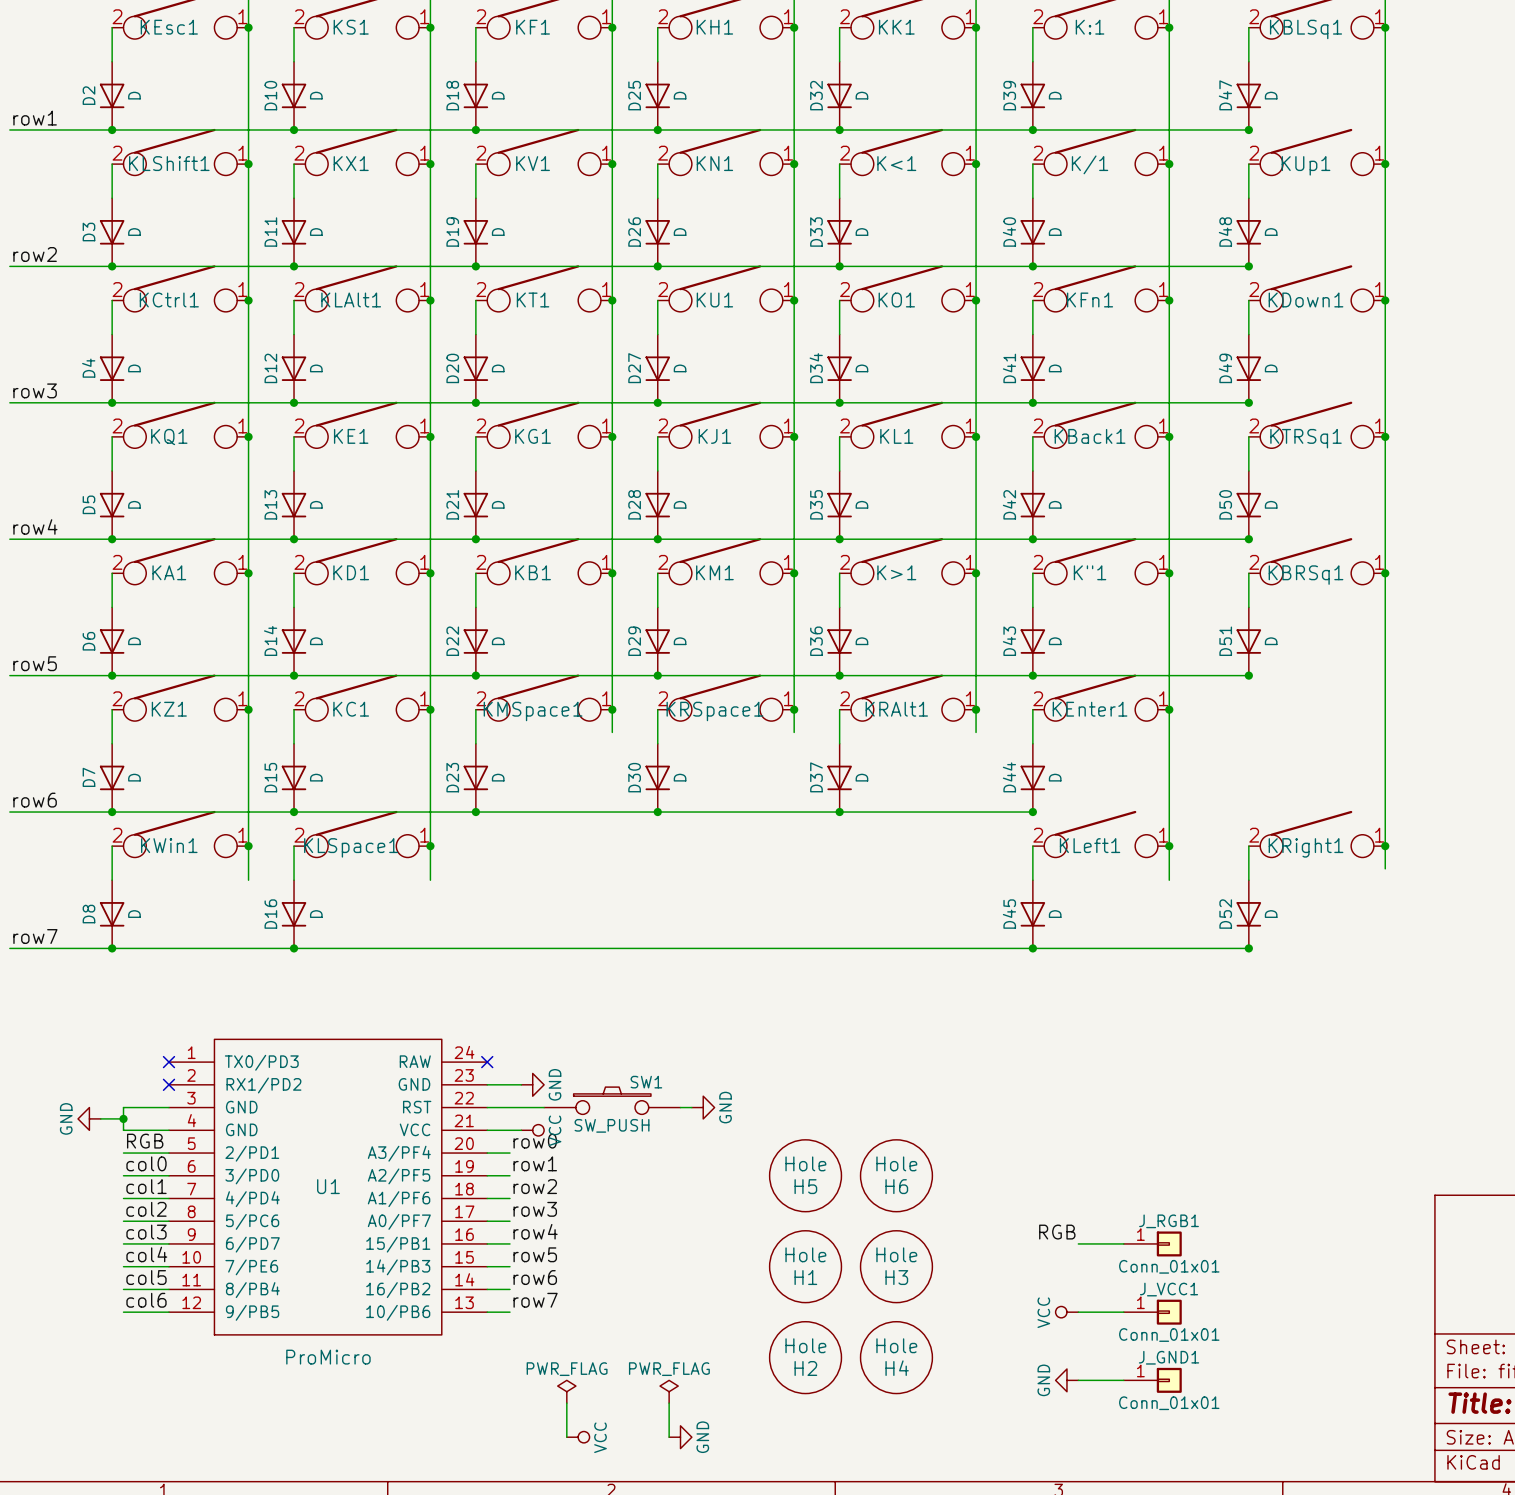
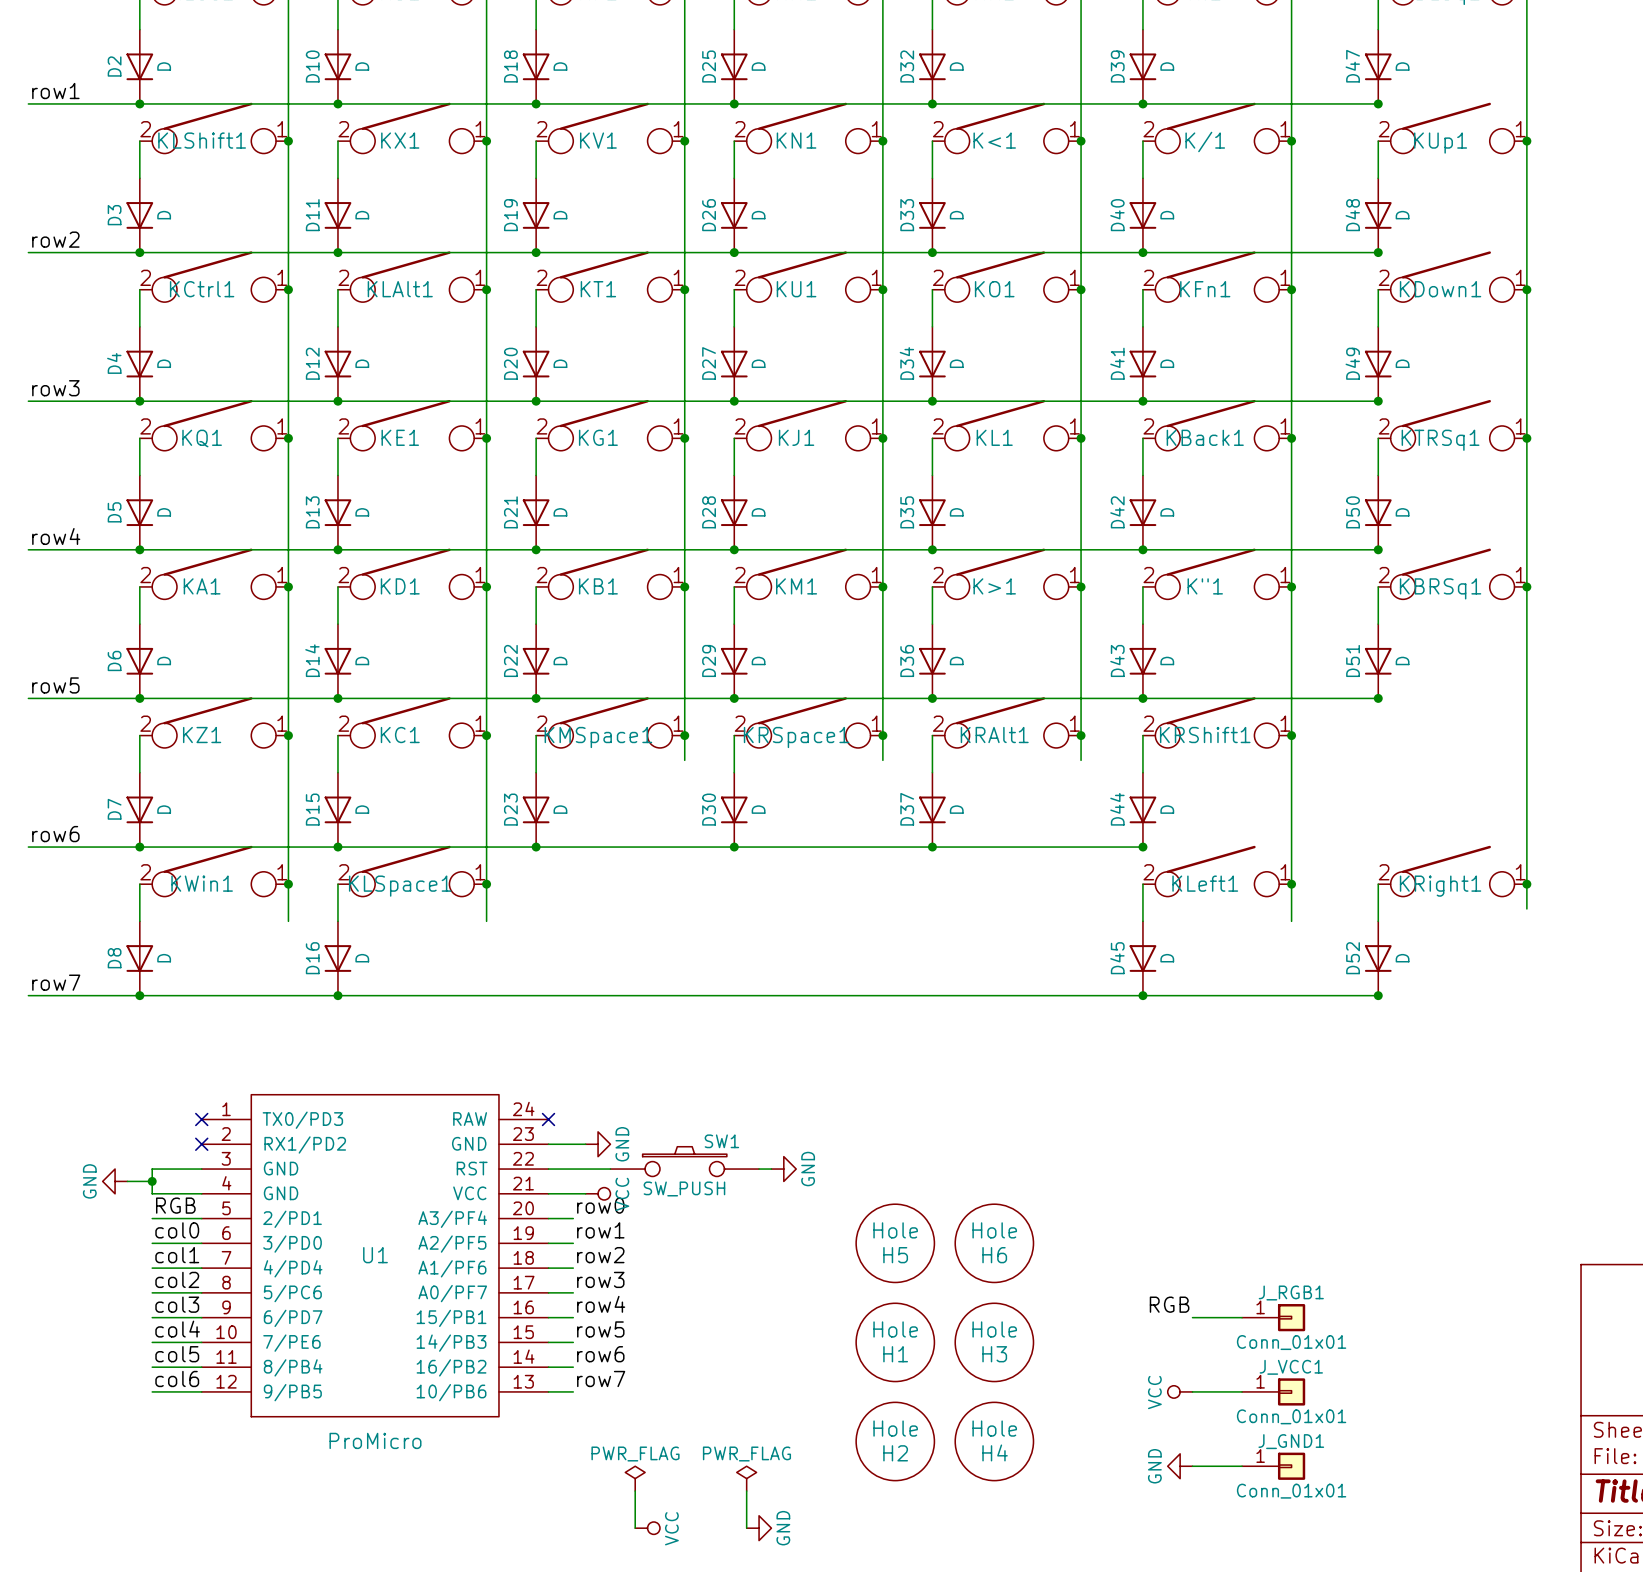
KEnter1 name: KEnter1 (1090, 709) -> KRShift1 (1205, 735)

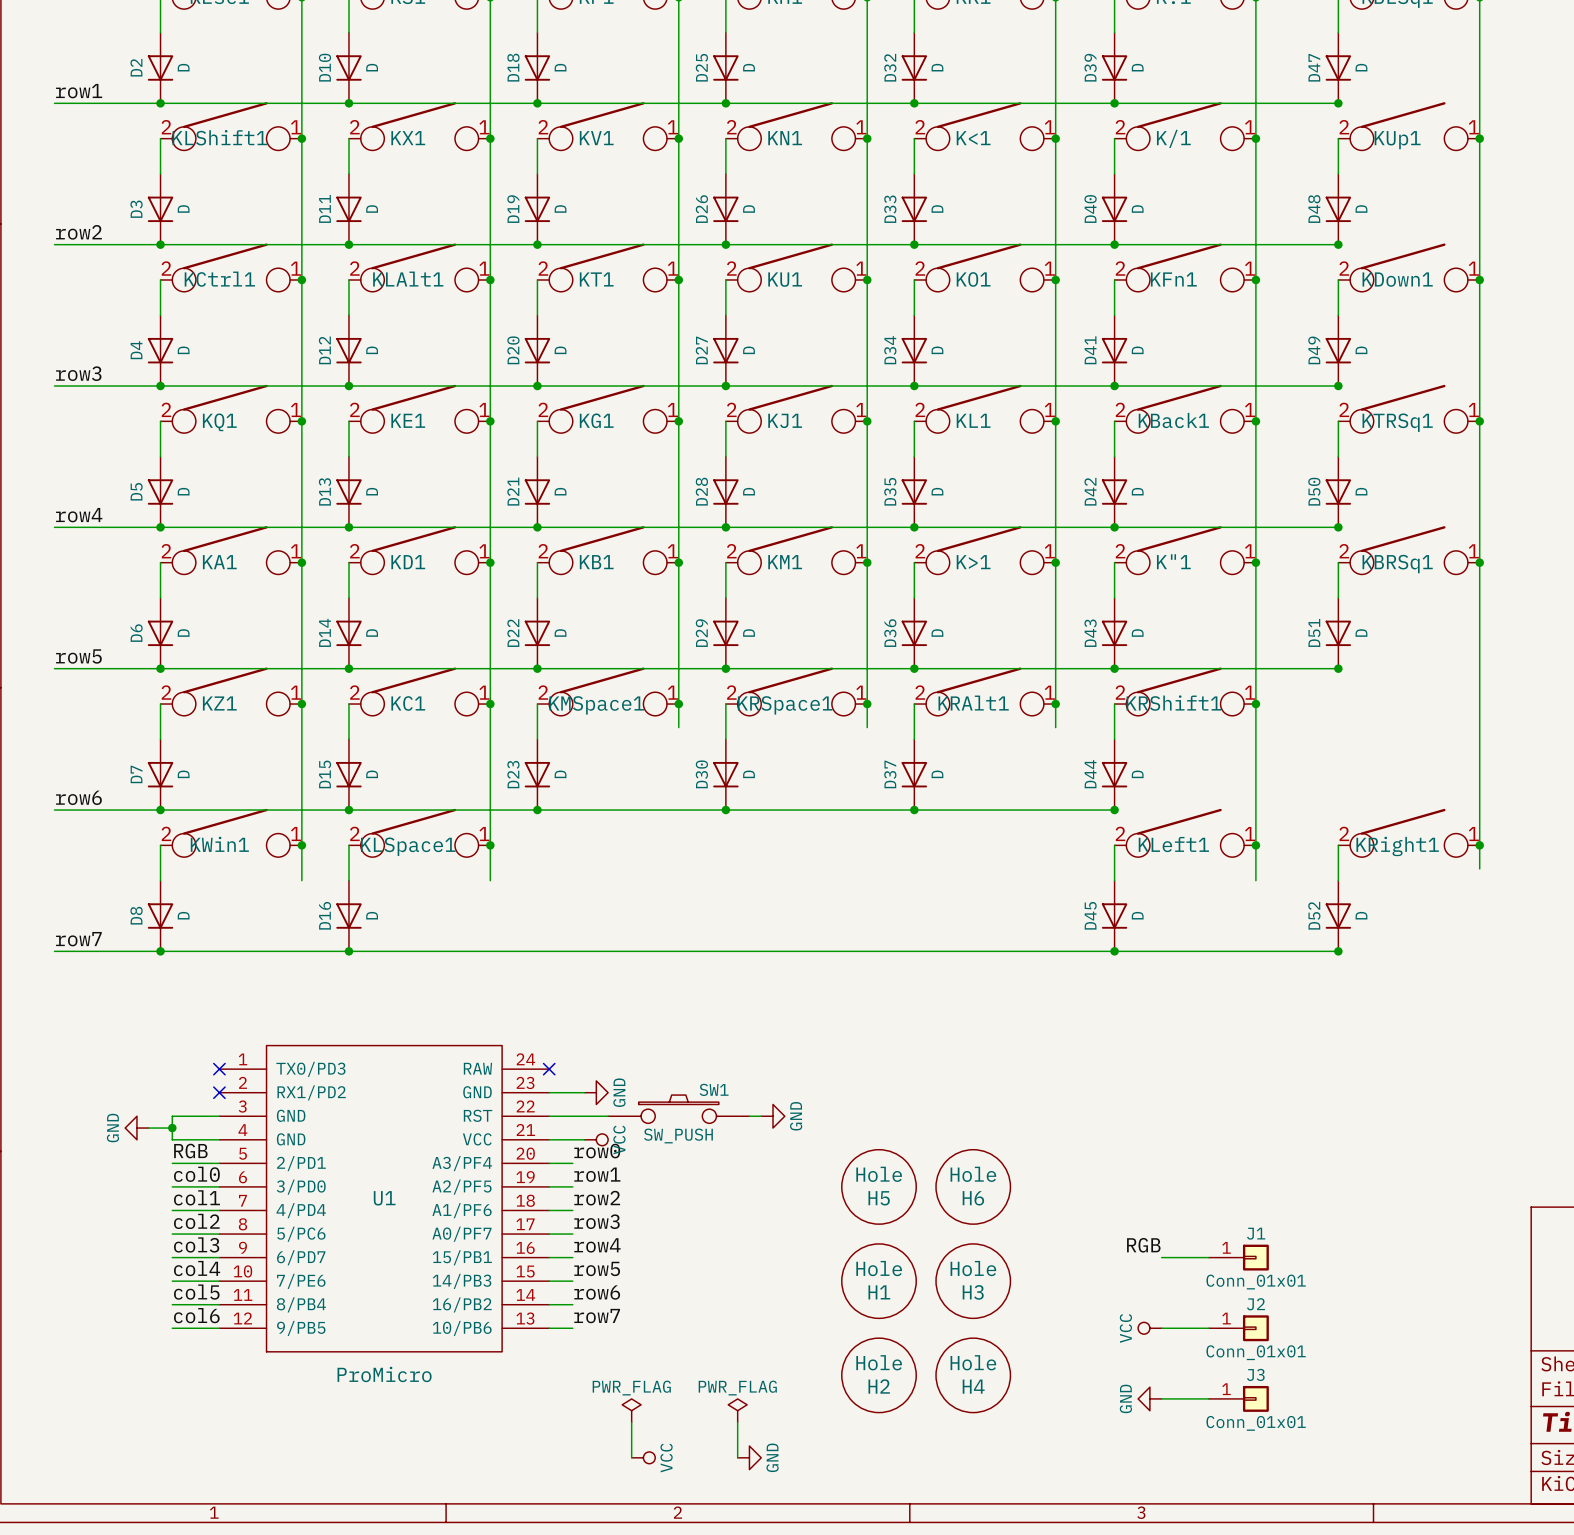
J_RGB1 name: J_RGB1 (1291, 1293) -> J1 (1256, 1233)
J_VCC1 name: J_VCC1 (1291, 1367) -> J2 (1256, 1304)
J_GND1 name: J_GND1 (1291, 1441) -> J3 (1255, 1374)

